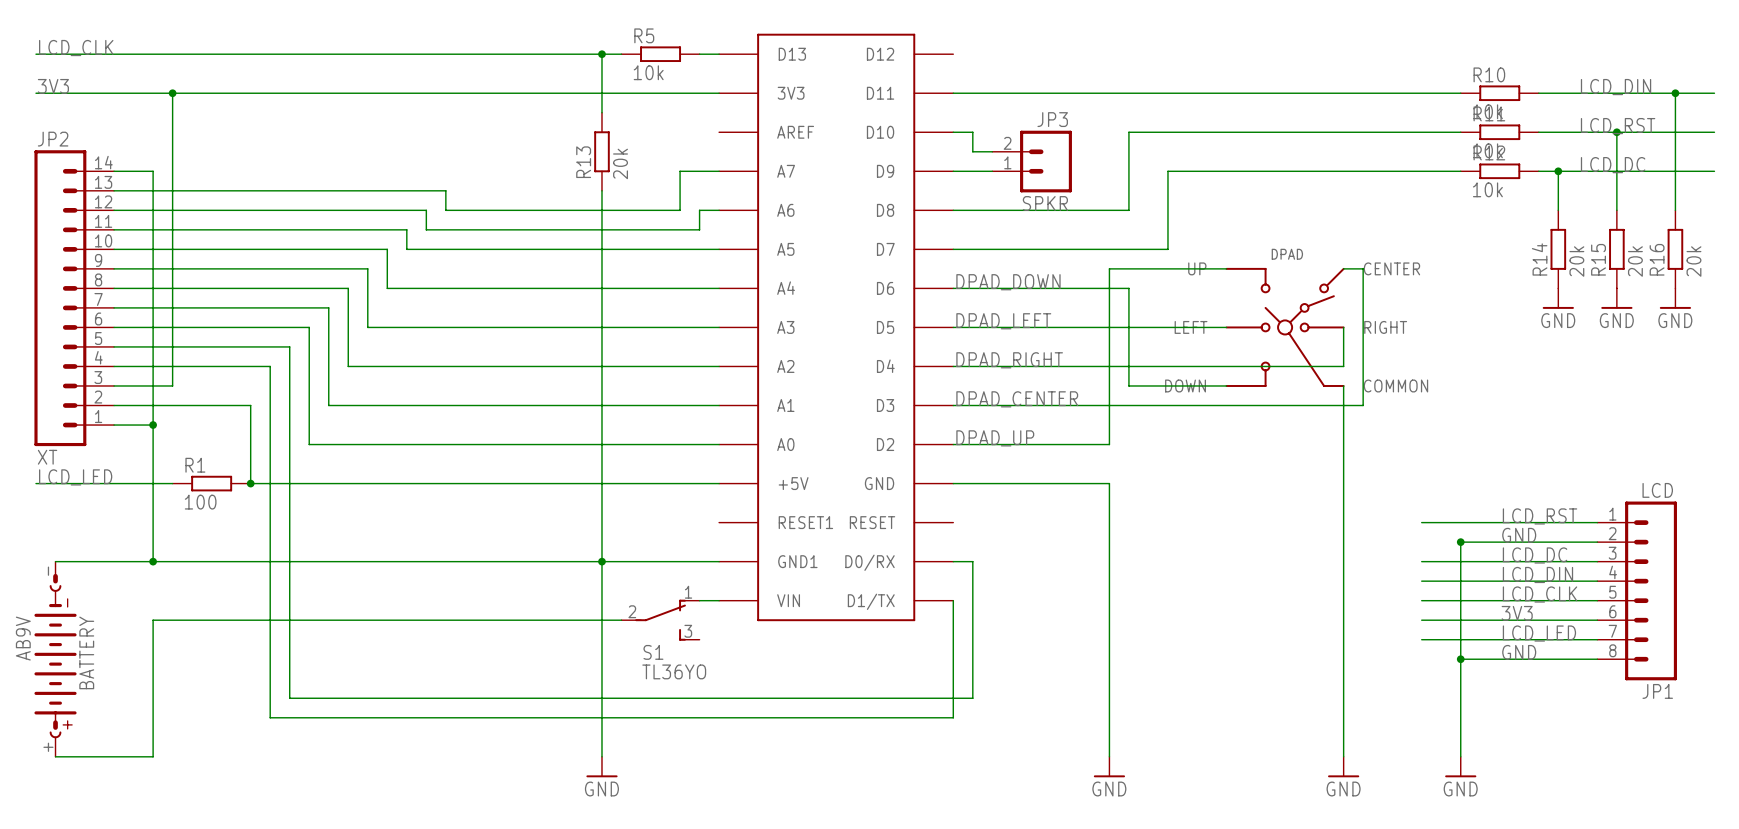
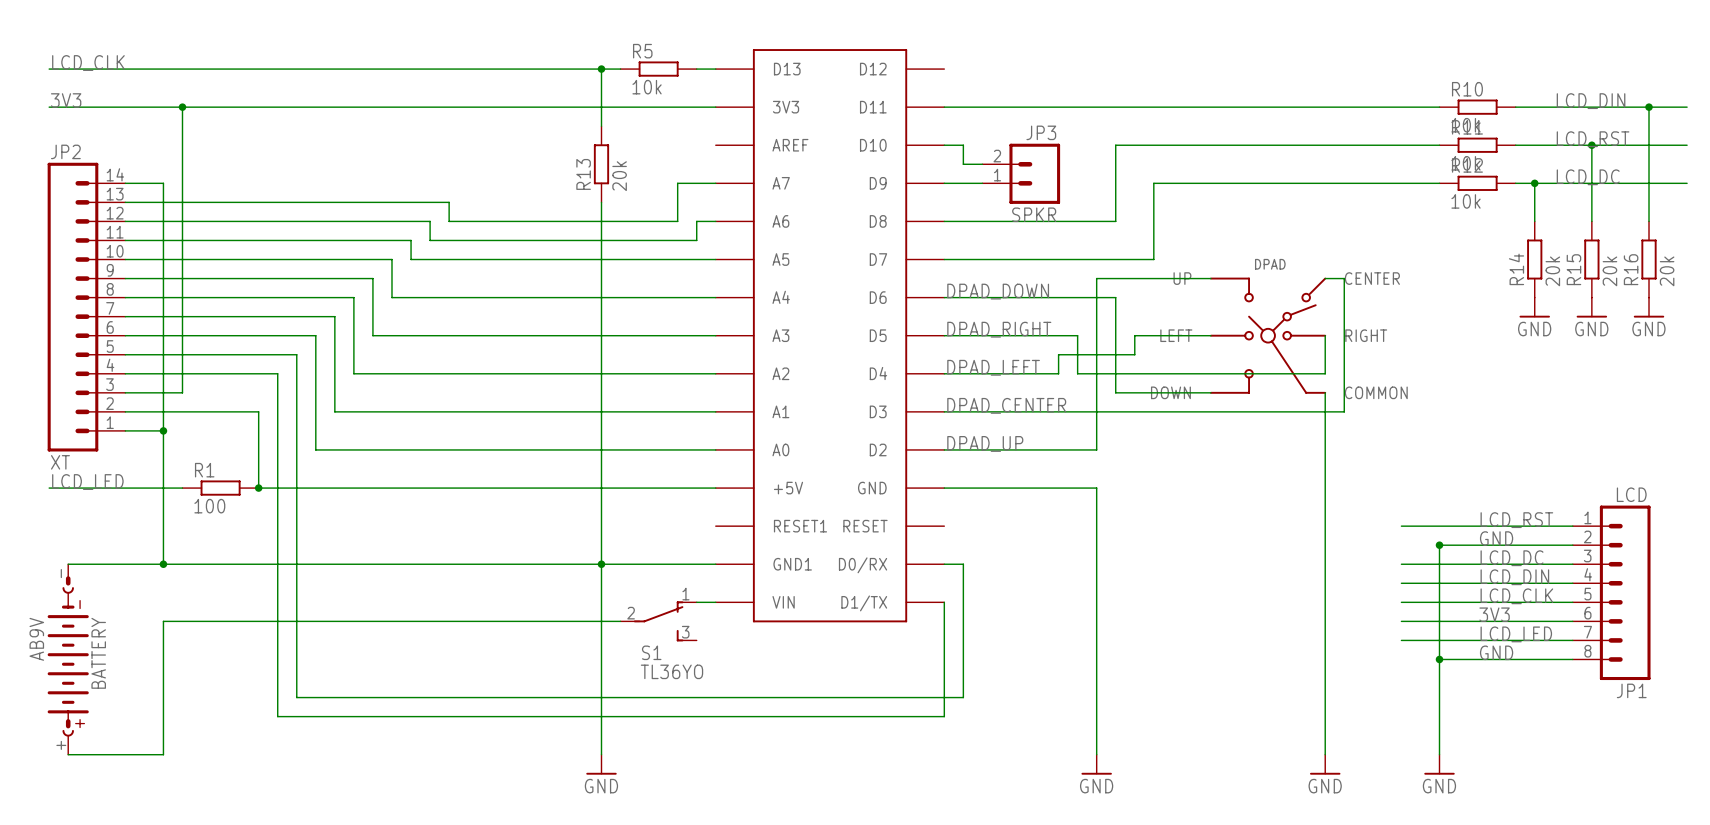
label: DPAD_LEFT (1003, 321) -> DPAD_RIGHT (999, 329)
wire: (1089, 327) (1148, 327) -> (1058, 373) (1058, 354) (1134, 354) (1134, 335)
label: DPAD_RIGHT (1009, 360) -> DPAD_LEFT (993, 367)
wire: (1070, 366) (1089, 366) -> (1077, 335) (1077, 373)

